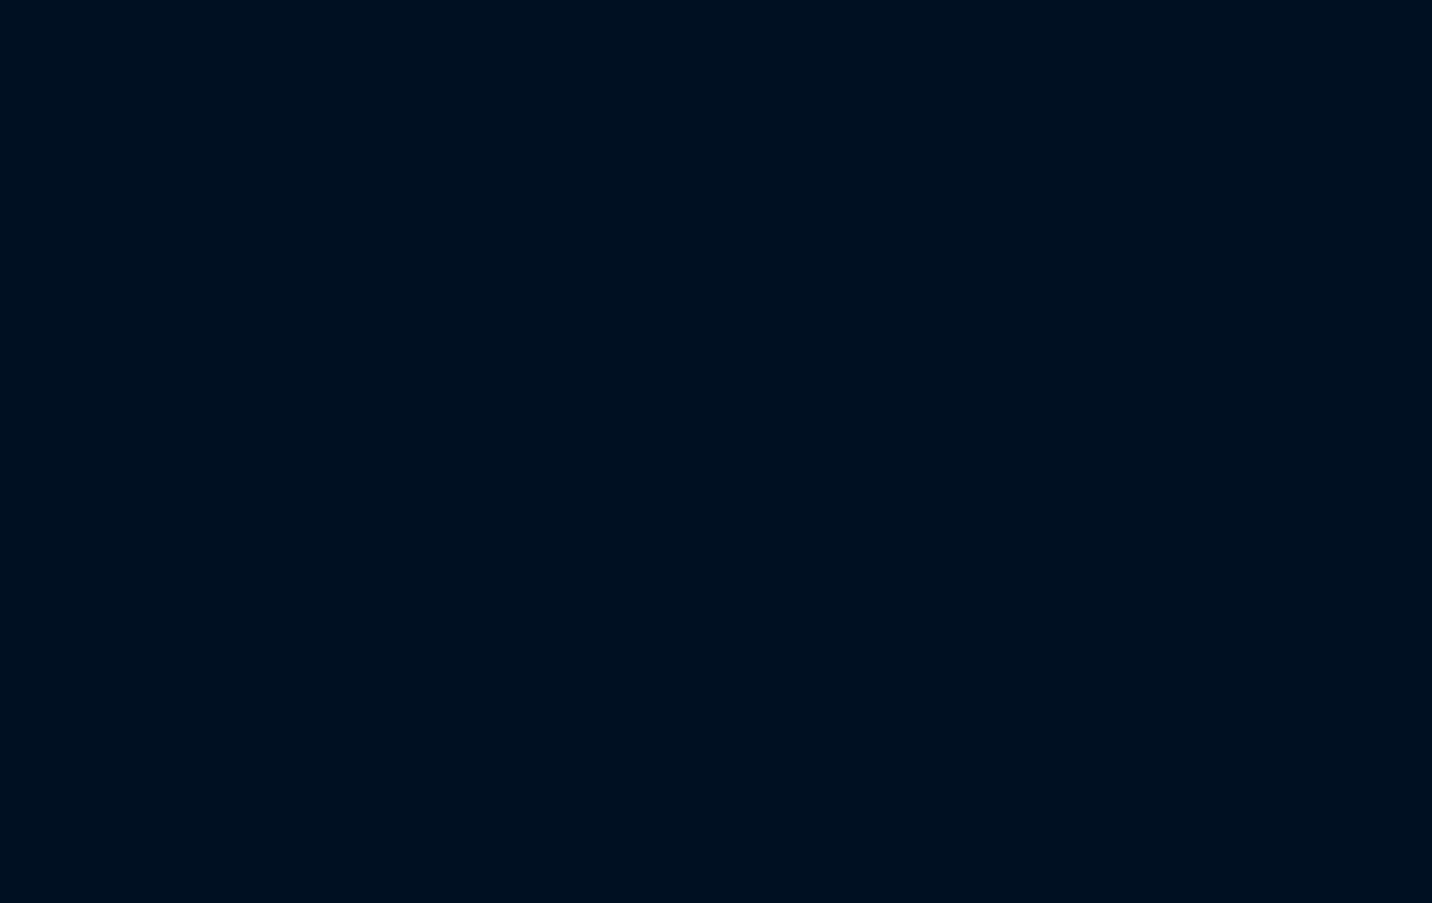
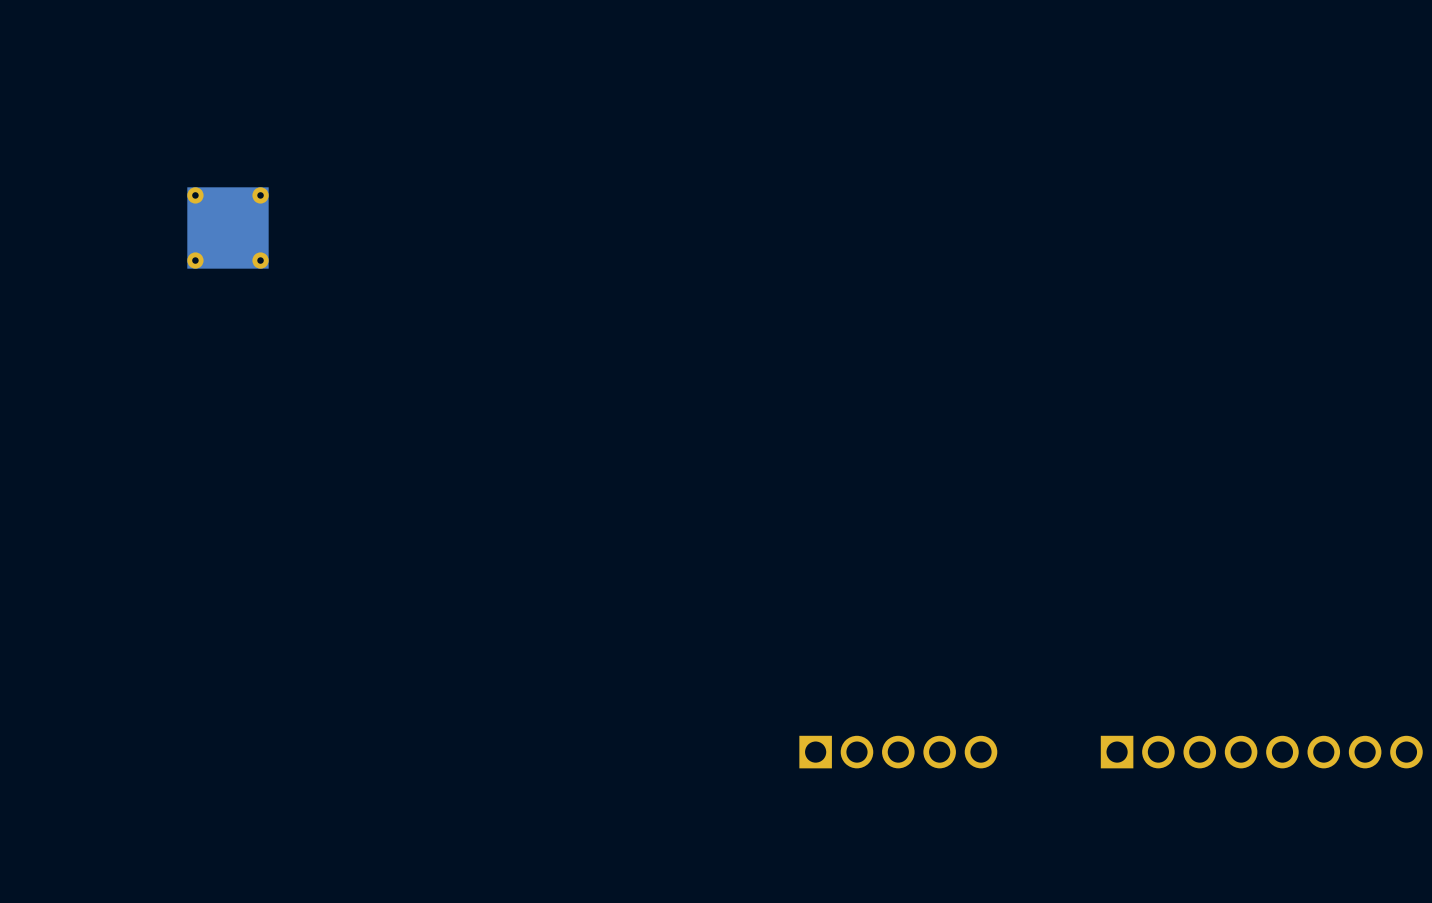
part: none -> (227, 227)
part: none -> (898, 752)
part: none -> (1261, 752)

